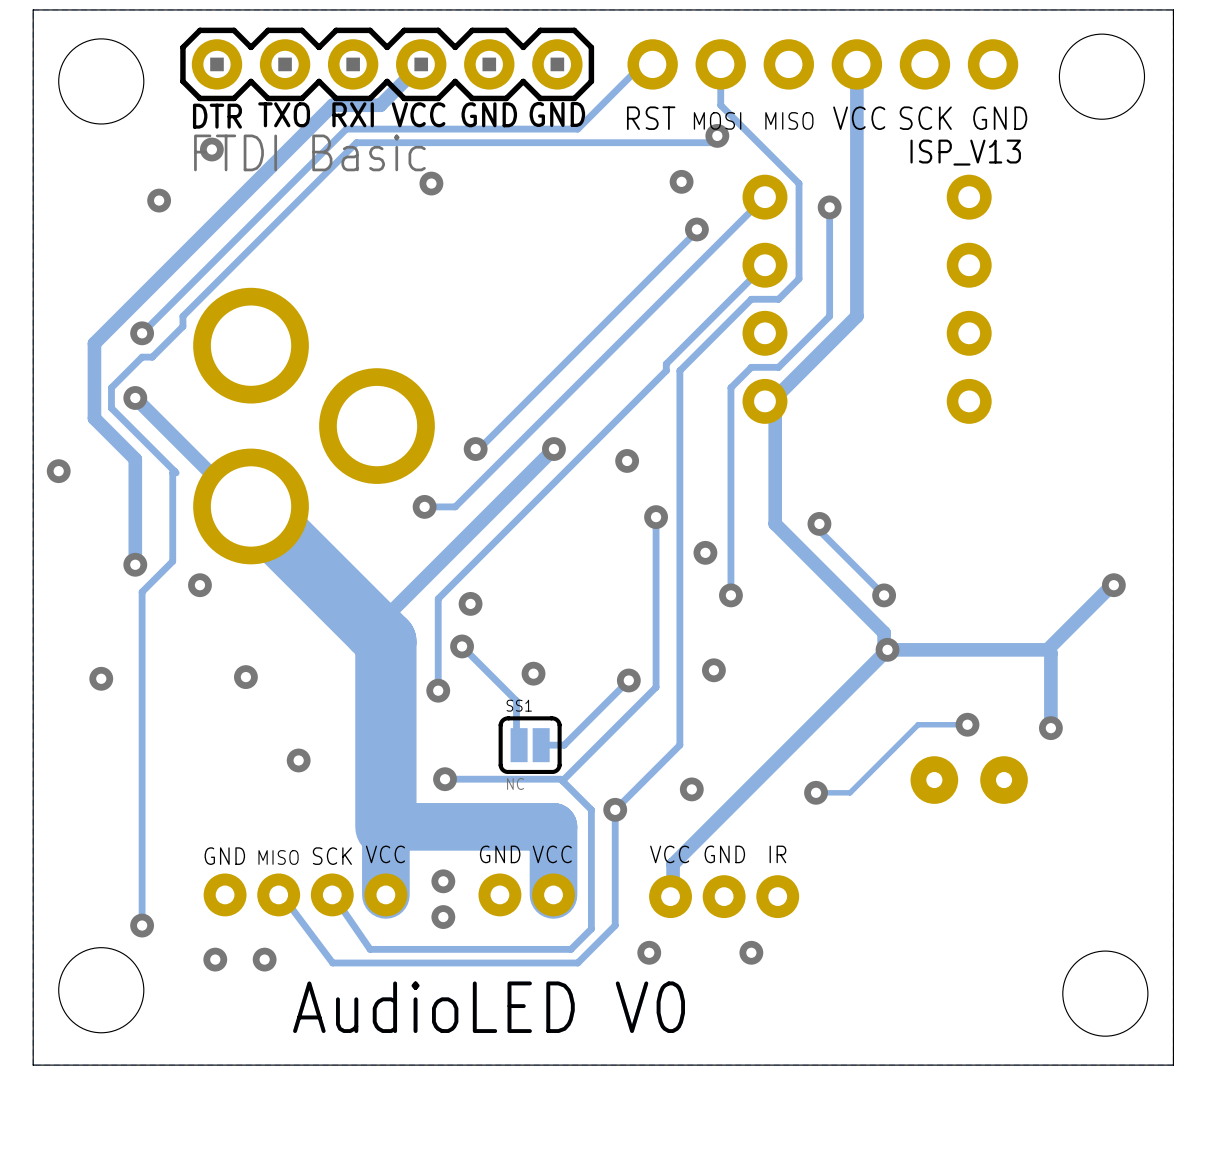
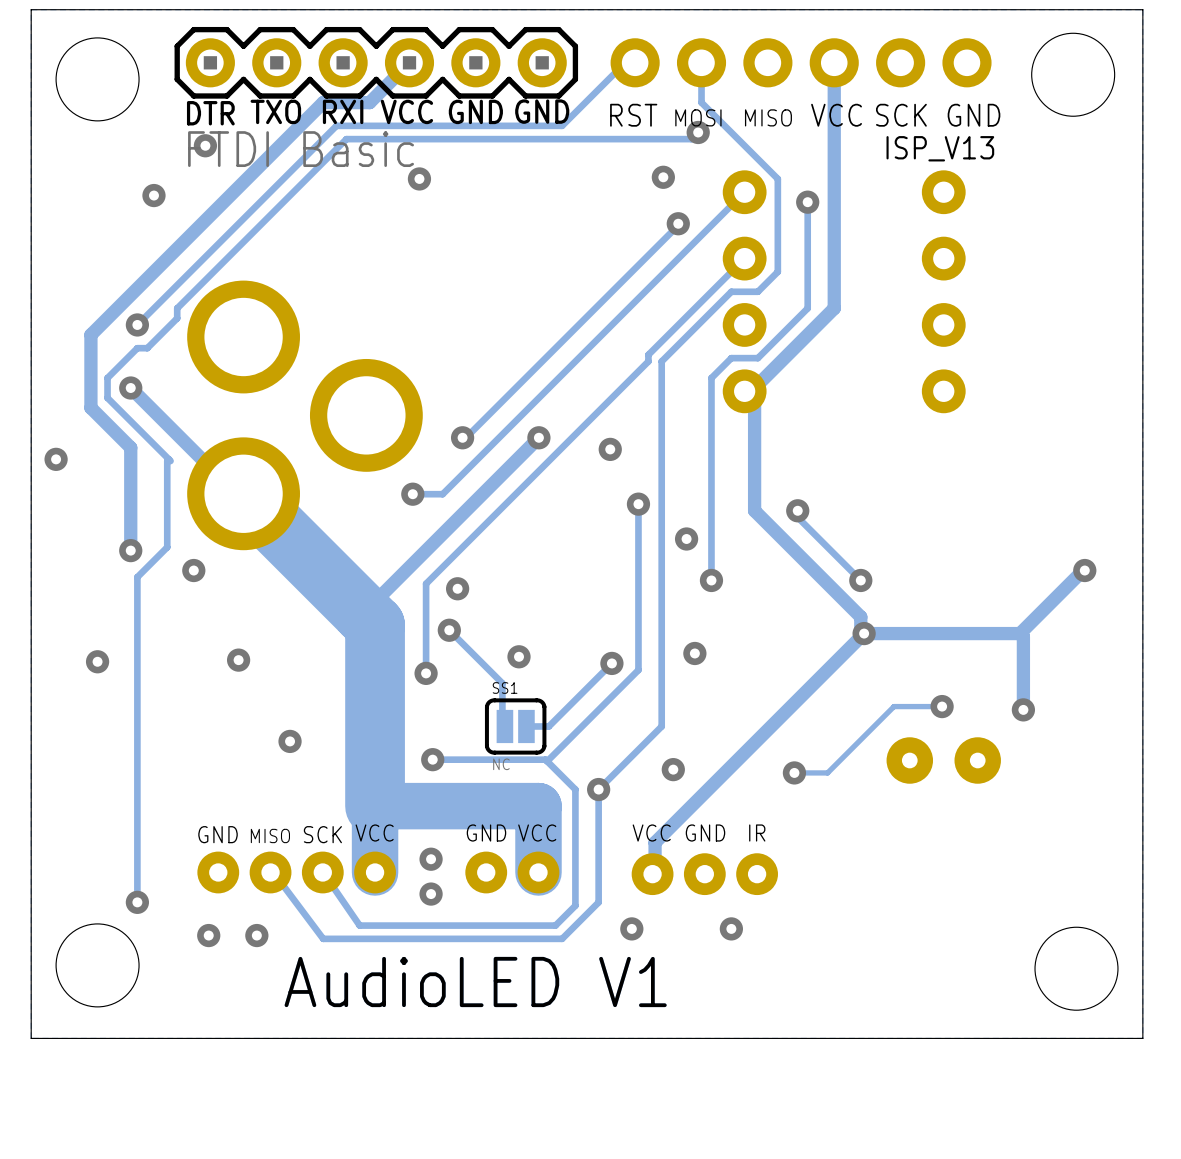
text: AudioLED V0 (489, 1007) -> none
text: none -> AudioLED V1 (475, 982)

